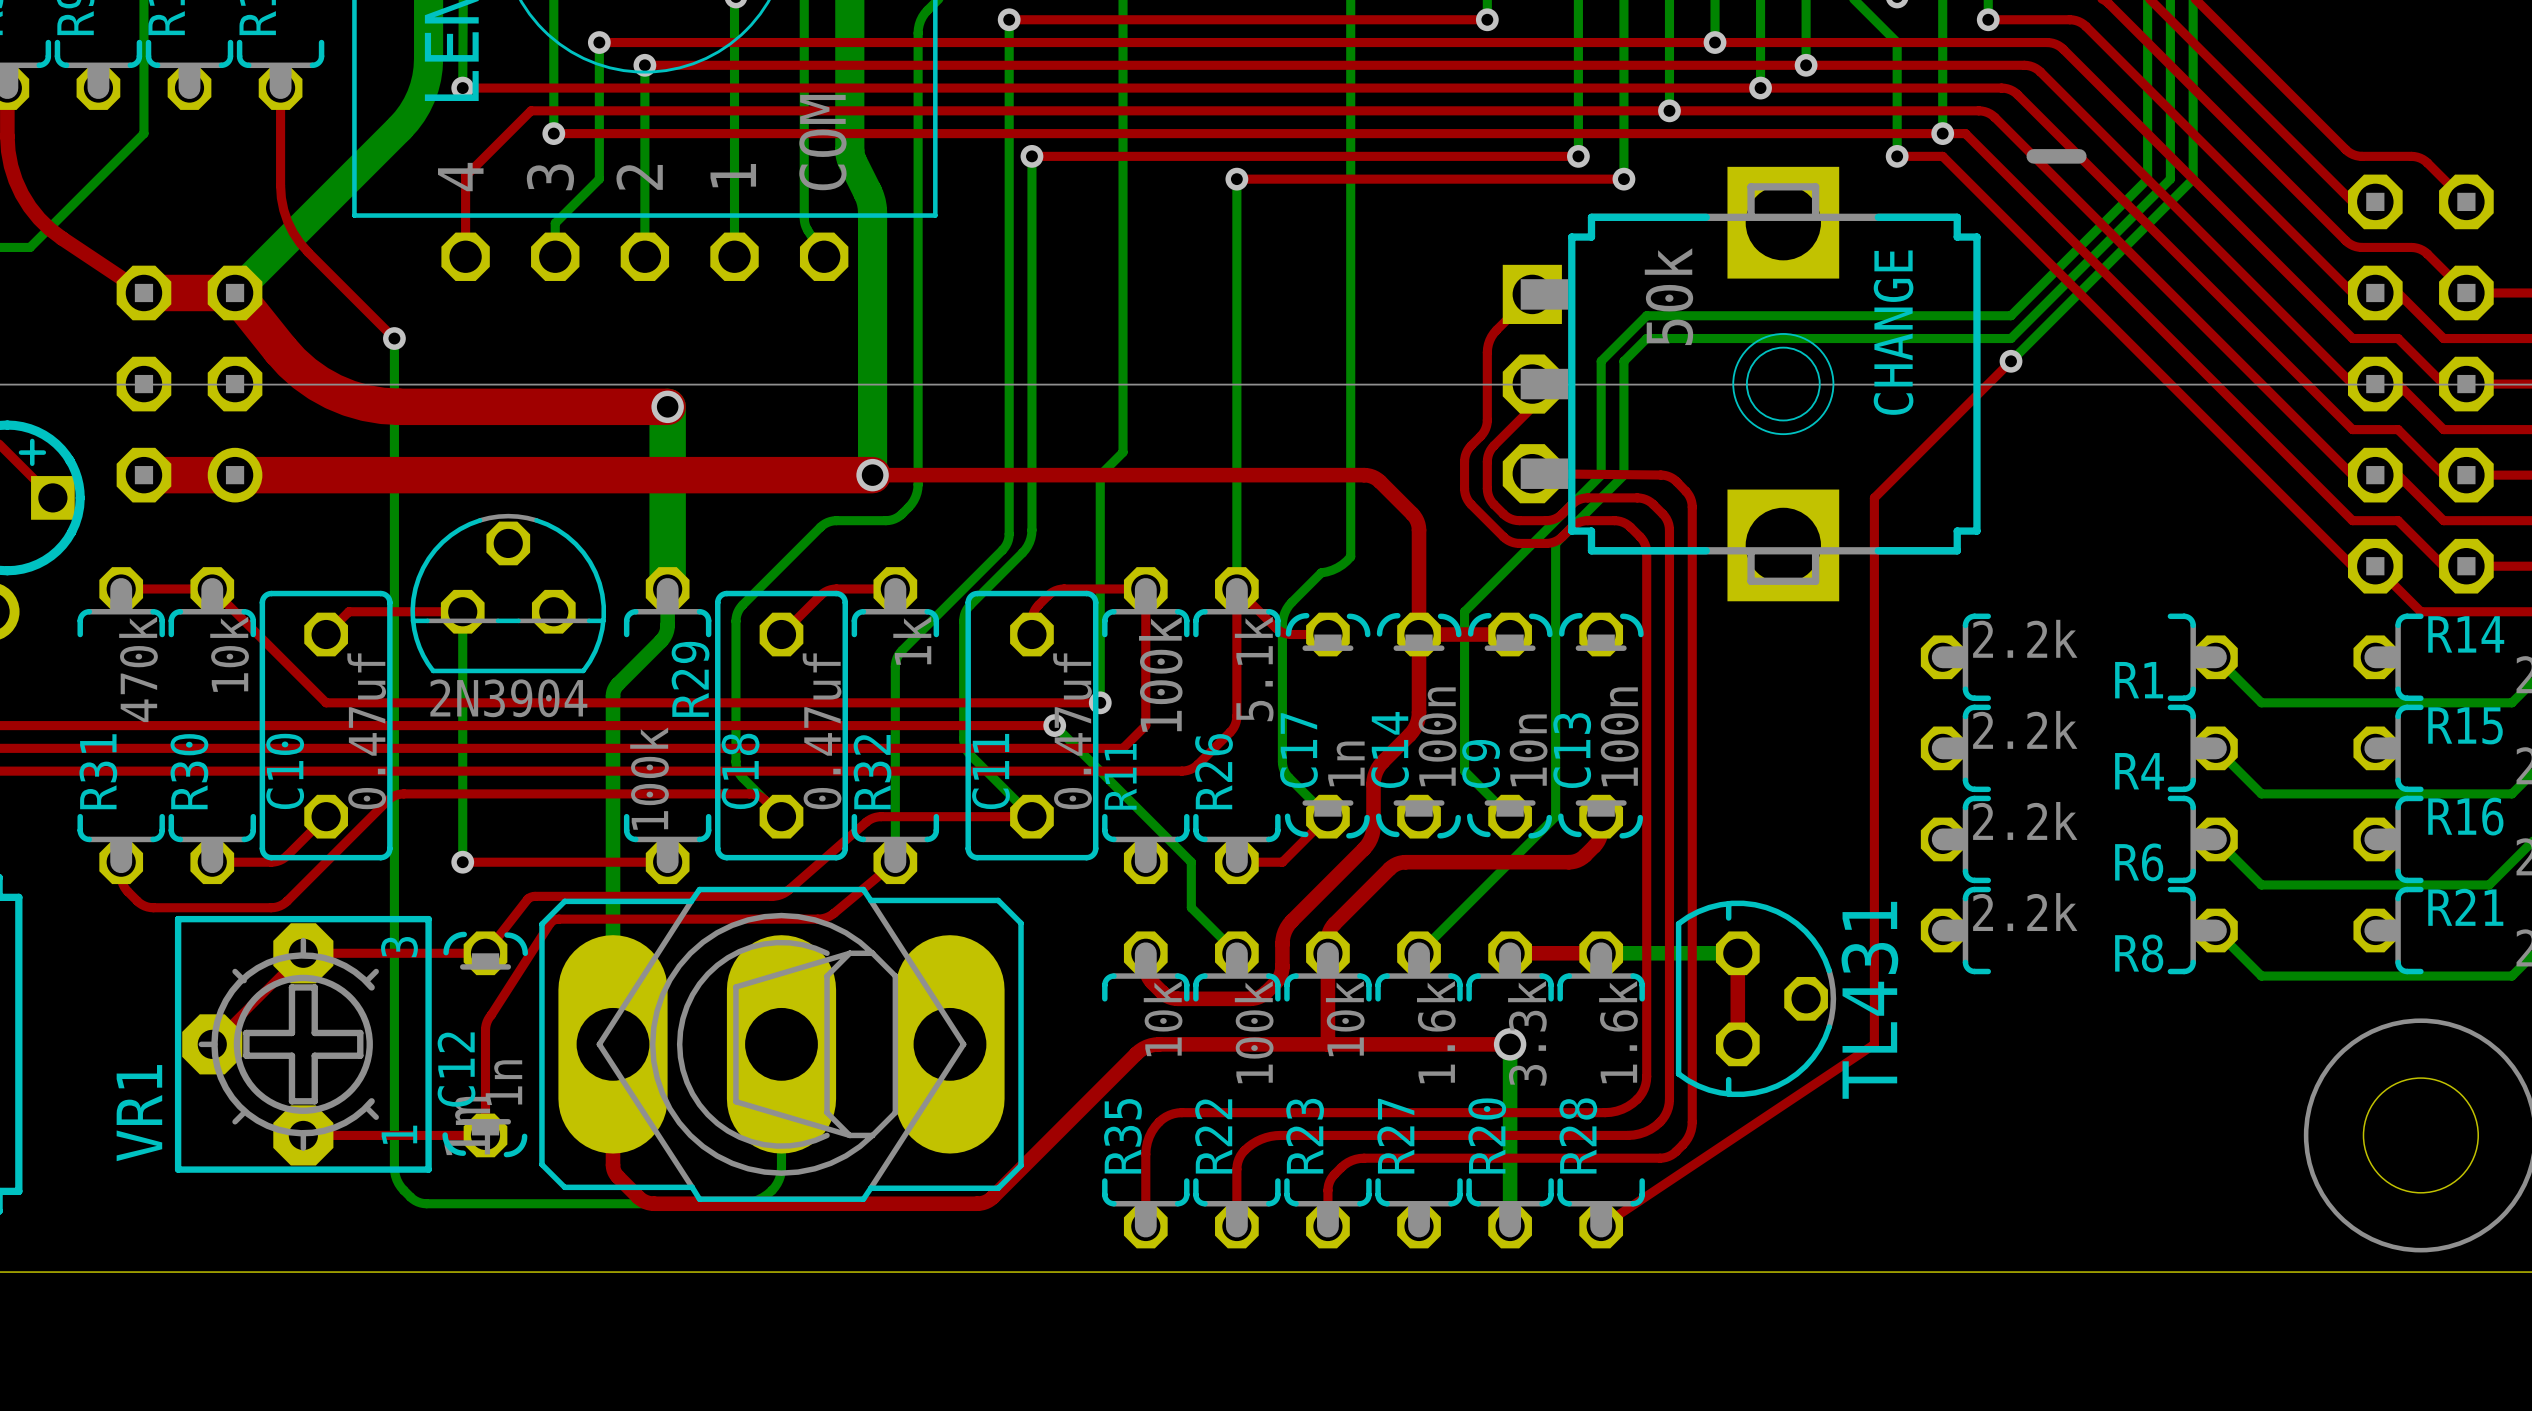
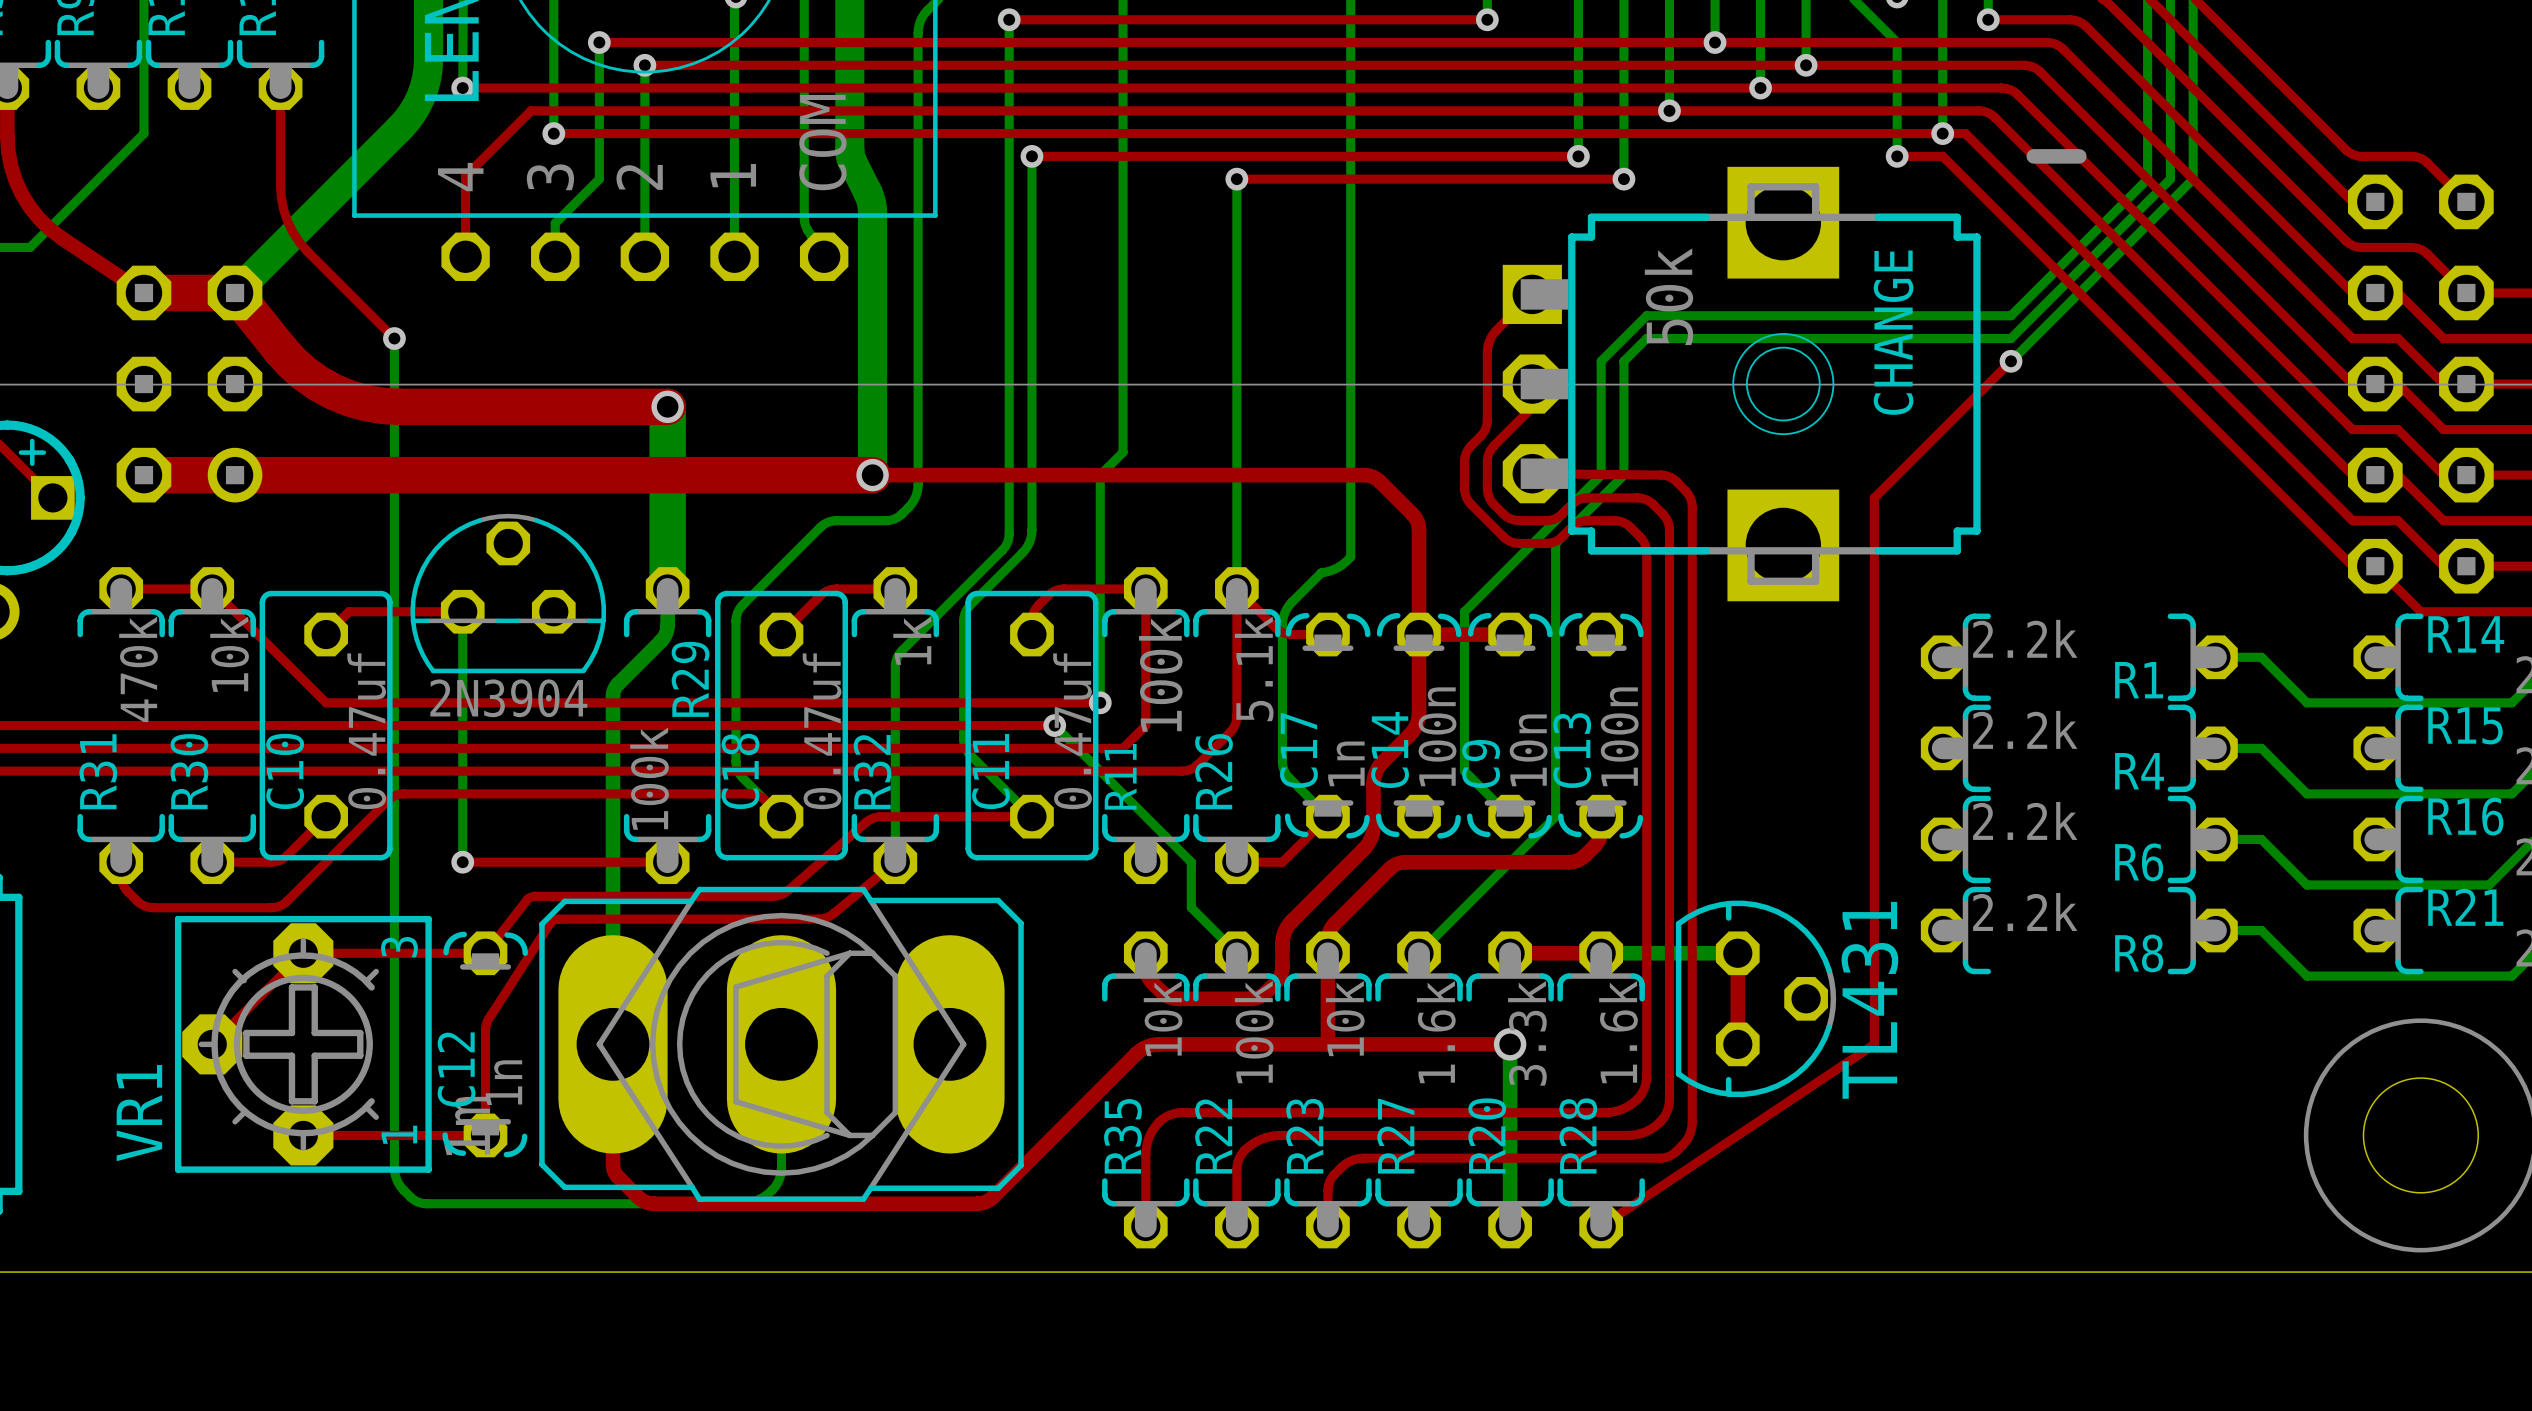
bottom track: (2215, 657) (2261, 702) (2307, 702) -> (2215, 657) (2261, 657) (2307, 702)
bottom track: (2215, 748) (2261, 793) (2307, 793) -> (2215, 748) (2261, 748) (2307, 793)
bottom track: (2215, 839) (2261, 884) (2307, 884) -> (2215, 839) (2261, 839) (2307, 884)
bottom track: (2215, 930) (2261, 976) (2307, 976) -> (2215, 930) (2261, 930) (2307, 976)

